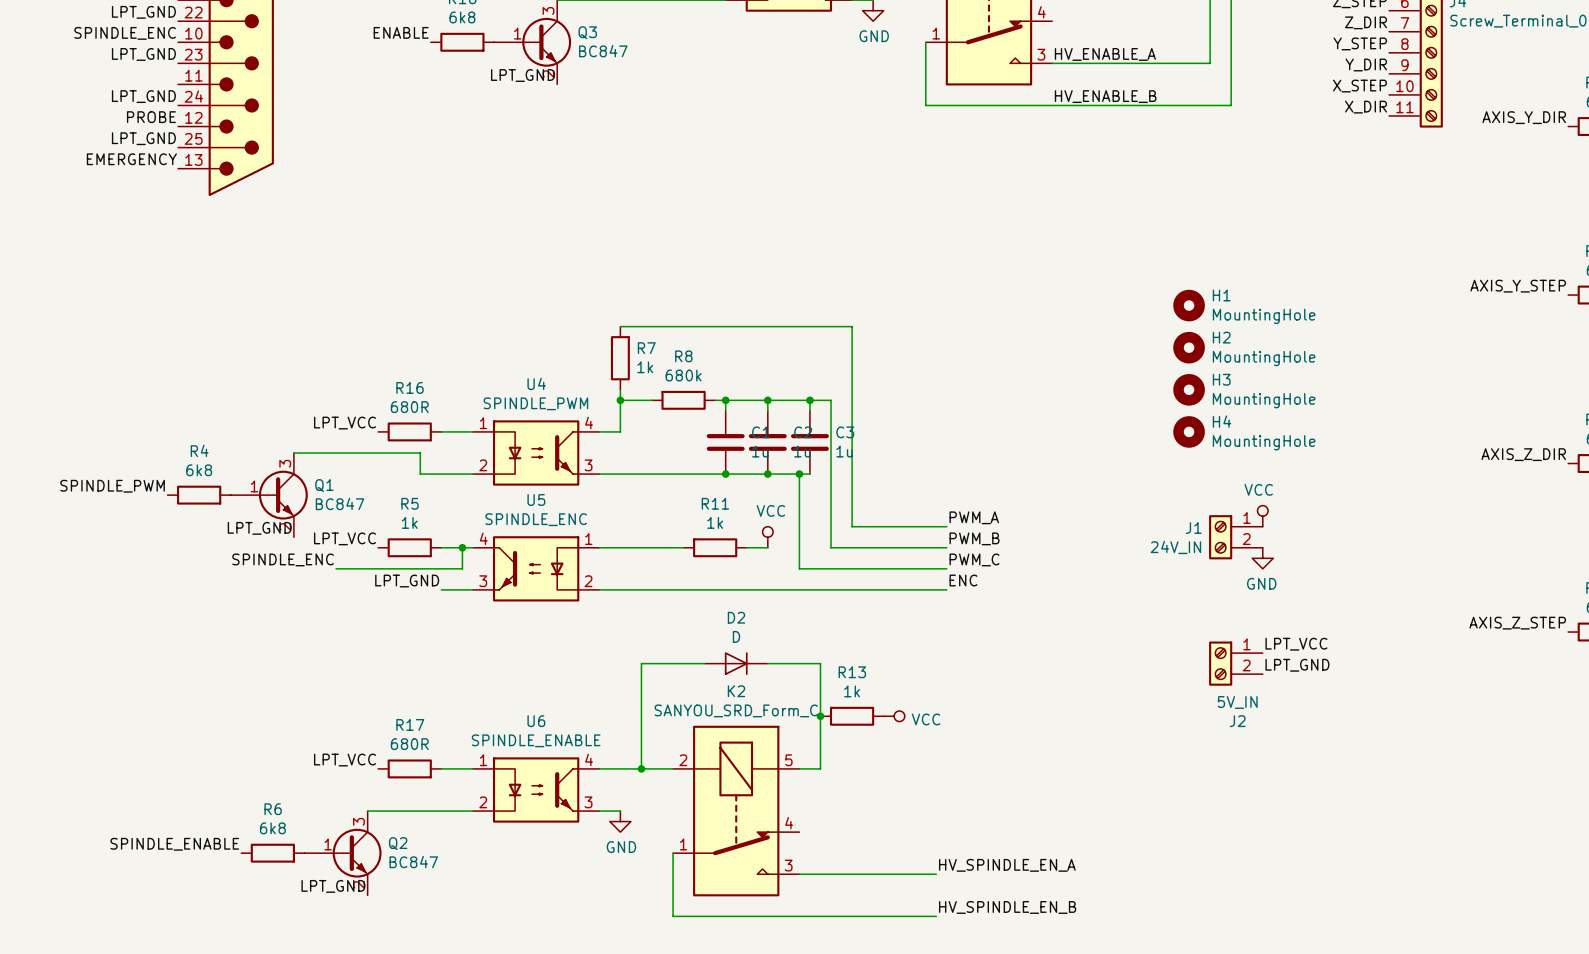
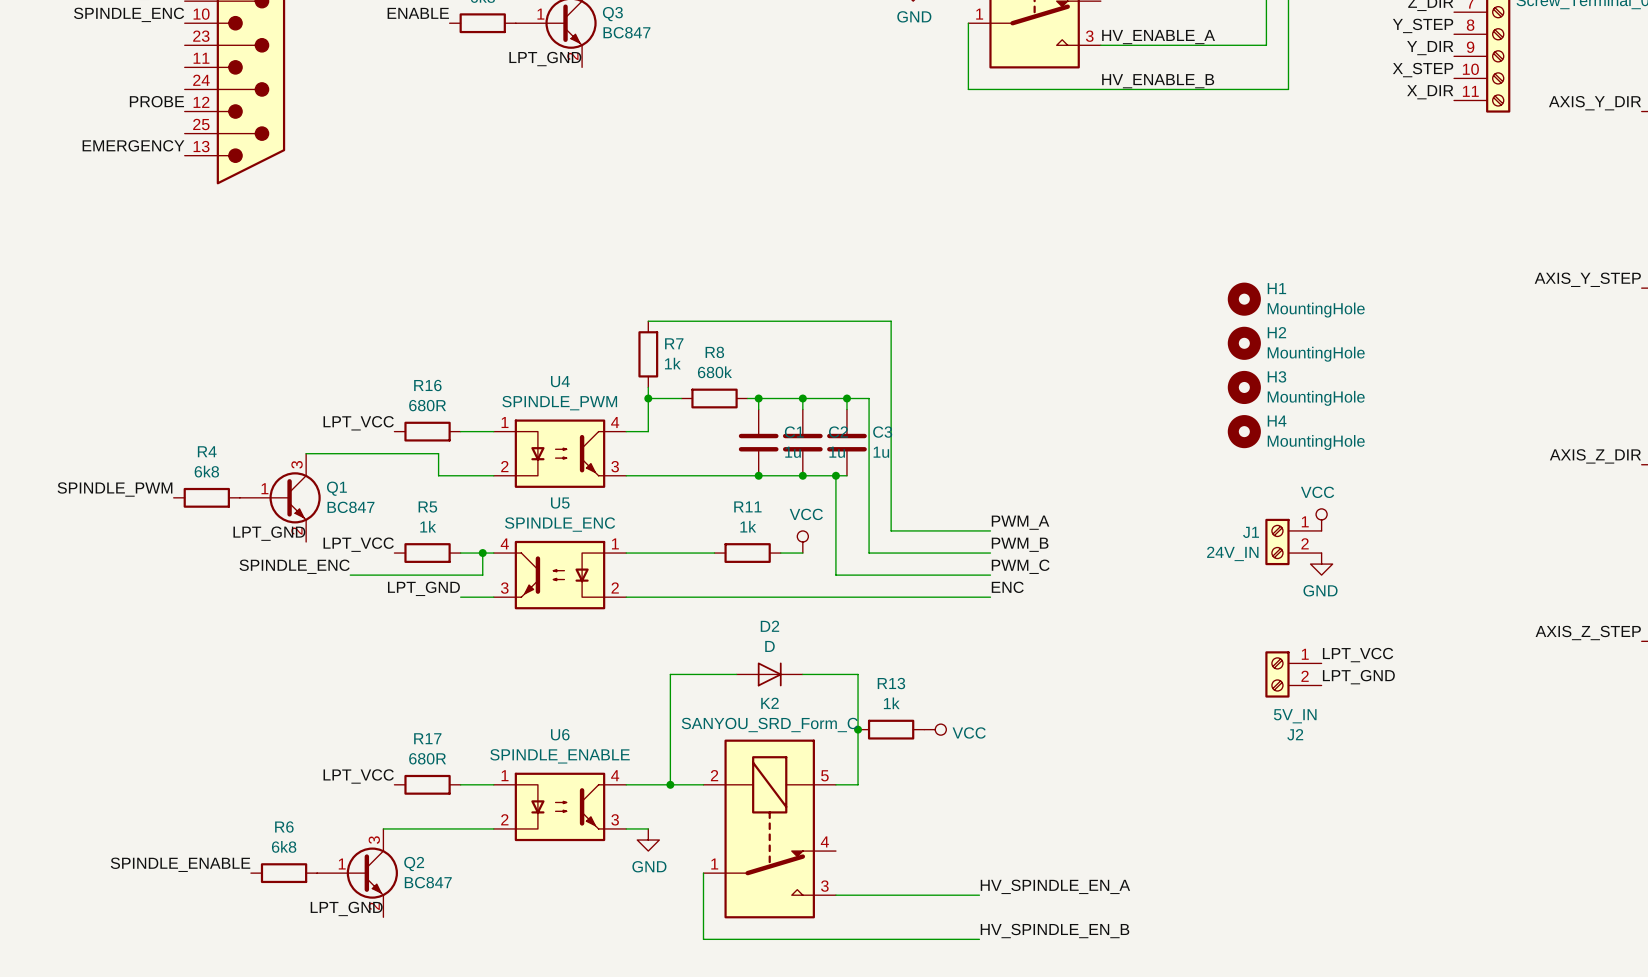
label: LPT_GND (143, 54) -> none
label: LPT_GND (143, 96) -> none
label: LPT_GND (143, 138) -> none

